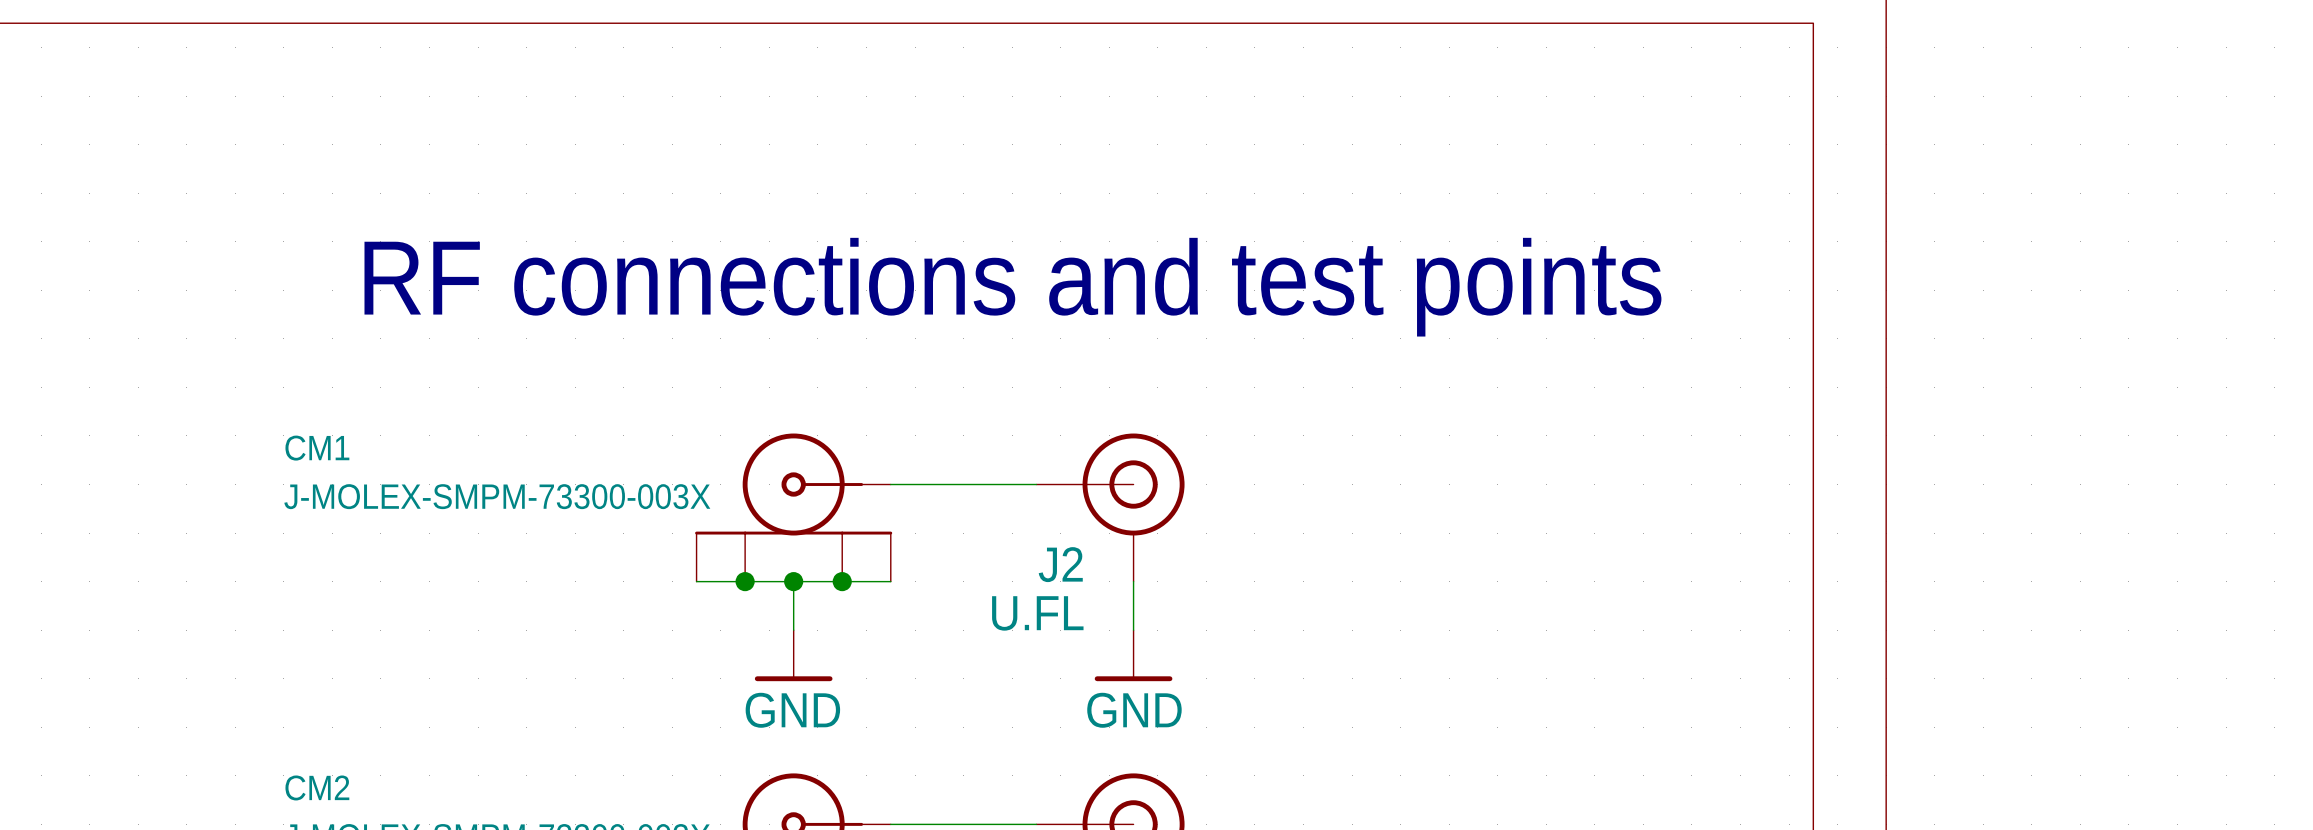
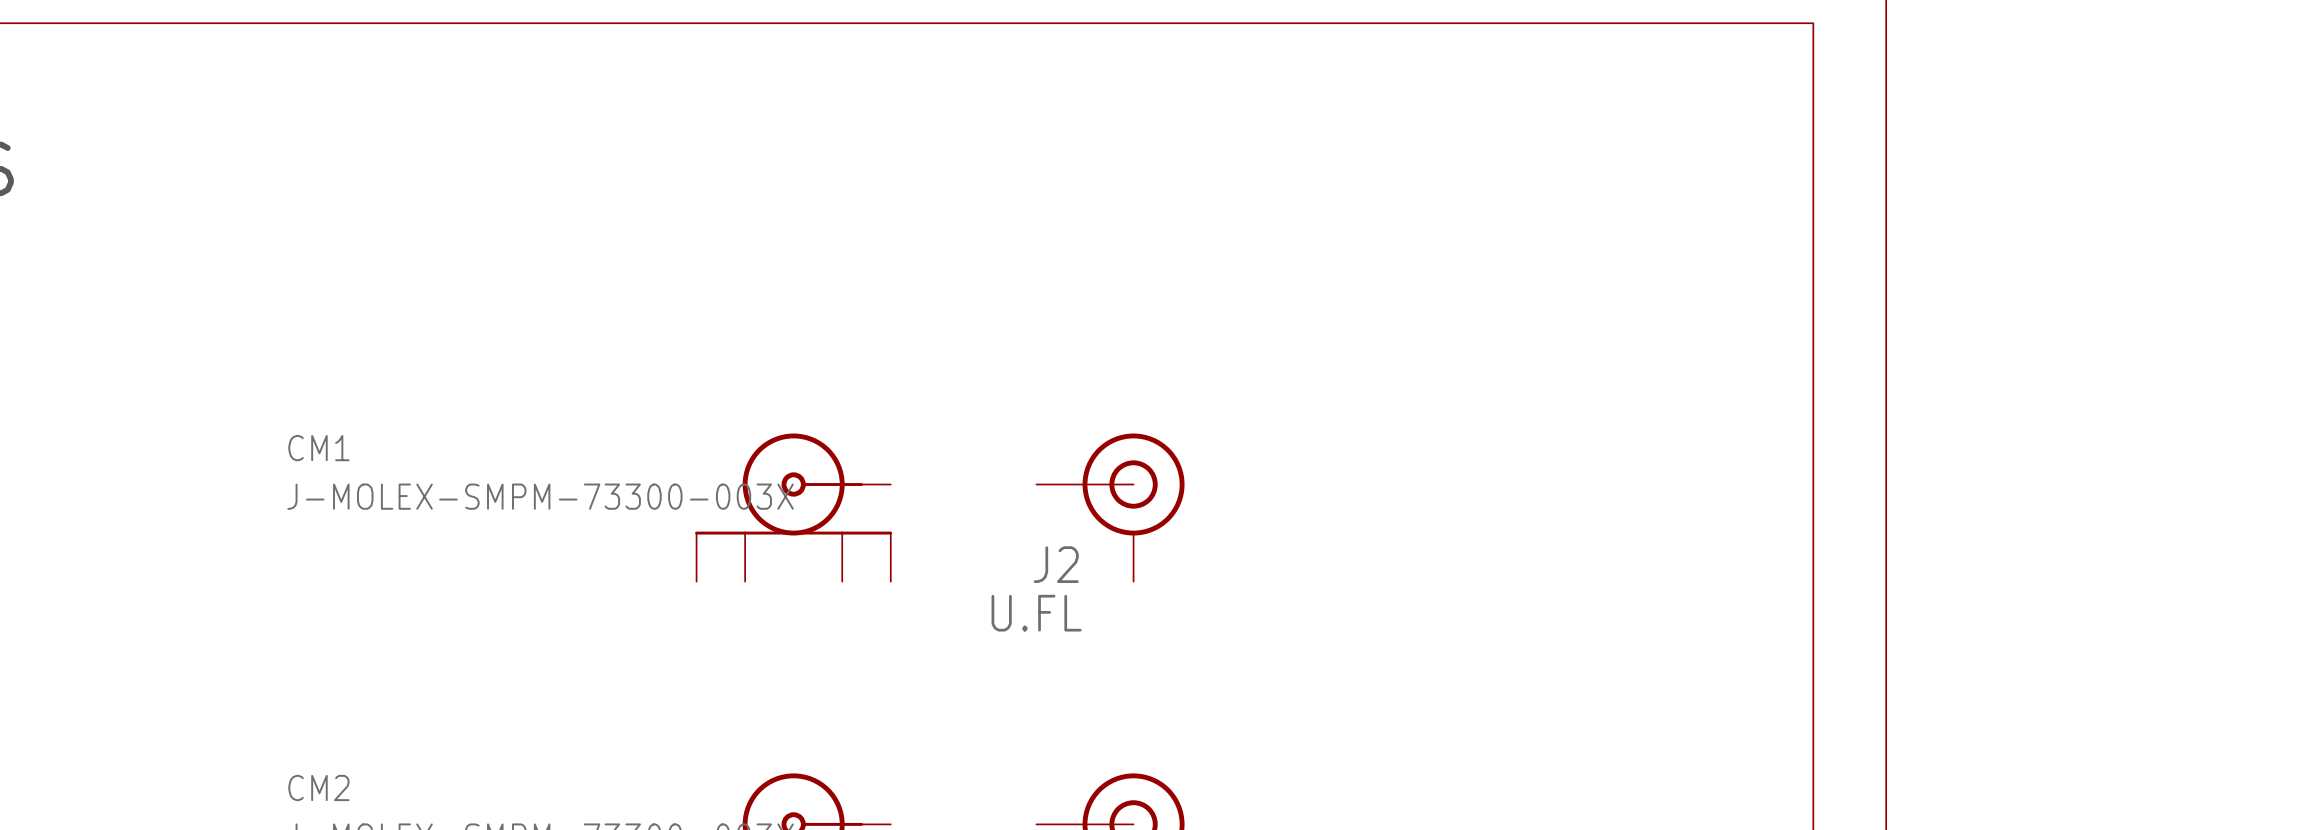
text: RF connections and test points (1012, 287) -> none
wire: (890, 484) (1036, 484) -> none
wire: (696, 581) (890, 581) -> none
junction: (745, 581) -> none
wire: (793, 581) (793, 630) -> none
junction: (793, 581) -> none
junction: (842, 581) -> none
wire: (1133, 581) (1133, 630) -> none
power symbol: GND (793, 655) -> none
power symbol: GND (1133, 655) -> none
wire: (890, 824) (1036, 824) -> none

